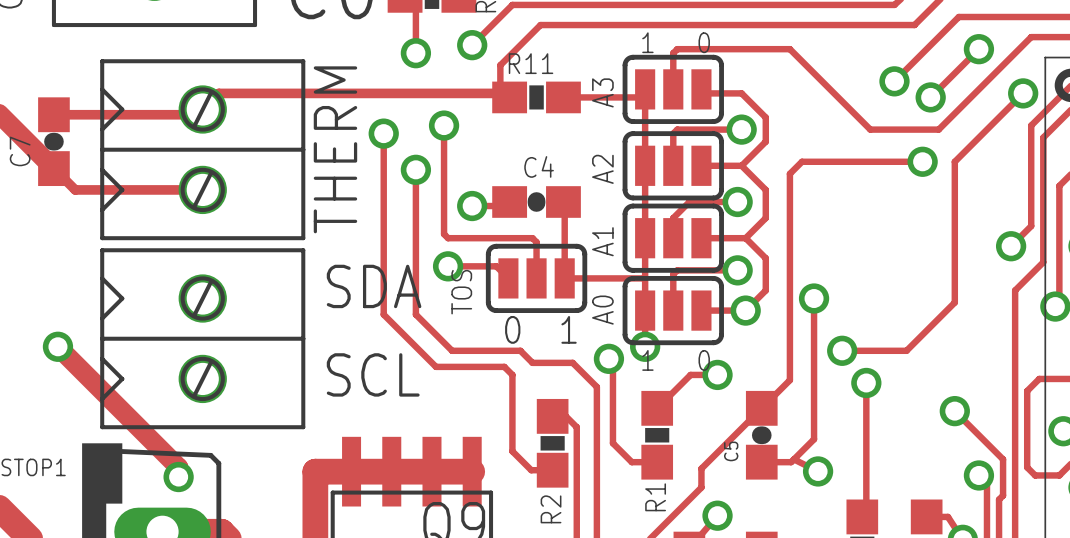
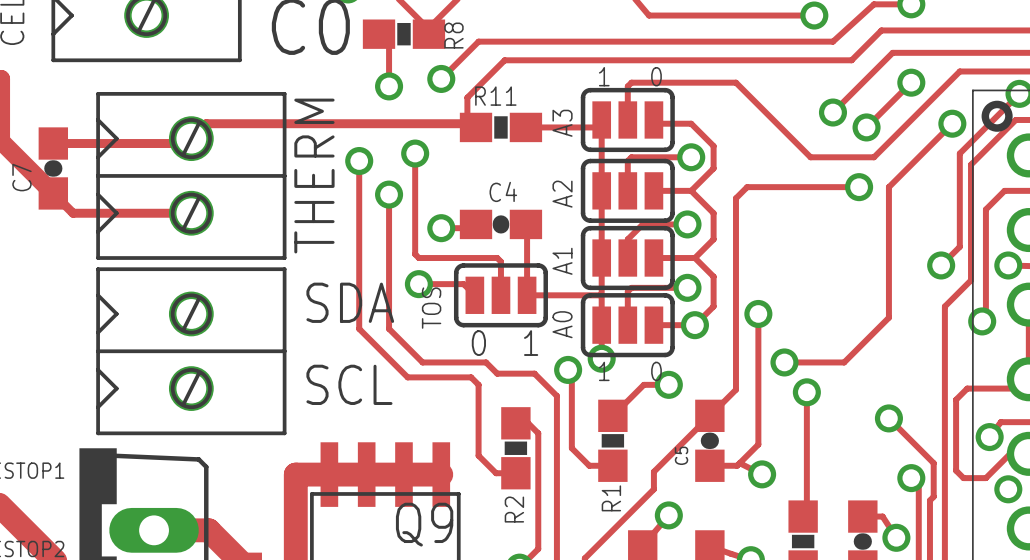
track: (57, 346) (178, 467) (178, 477) -> none
via: (57, 346) -> none
via: (178, 477) -> none

